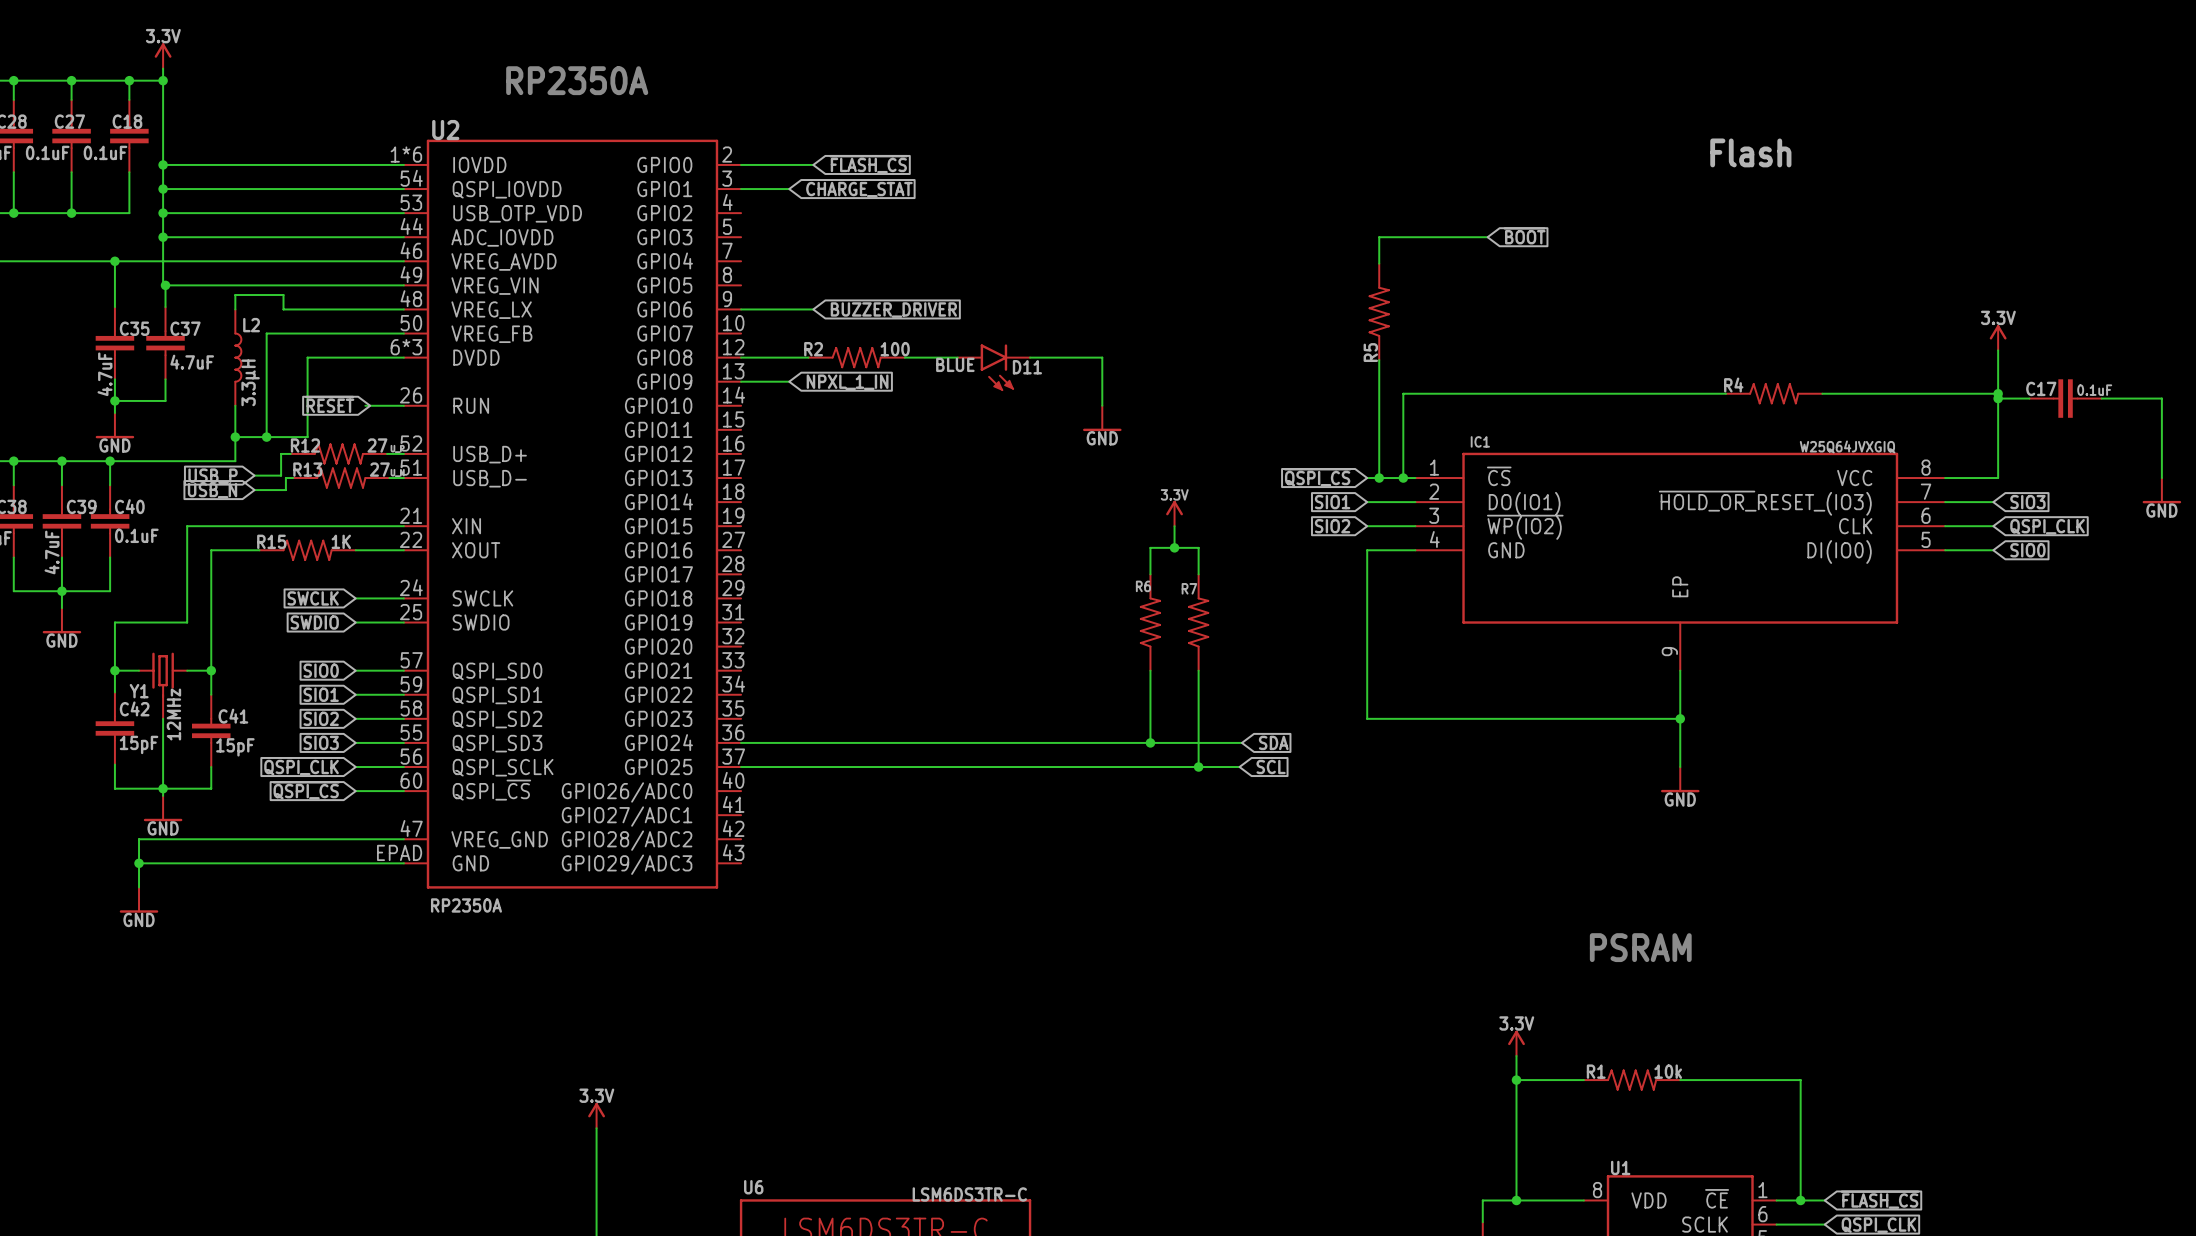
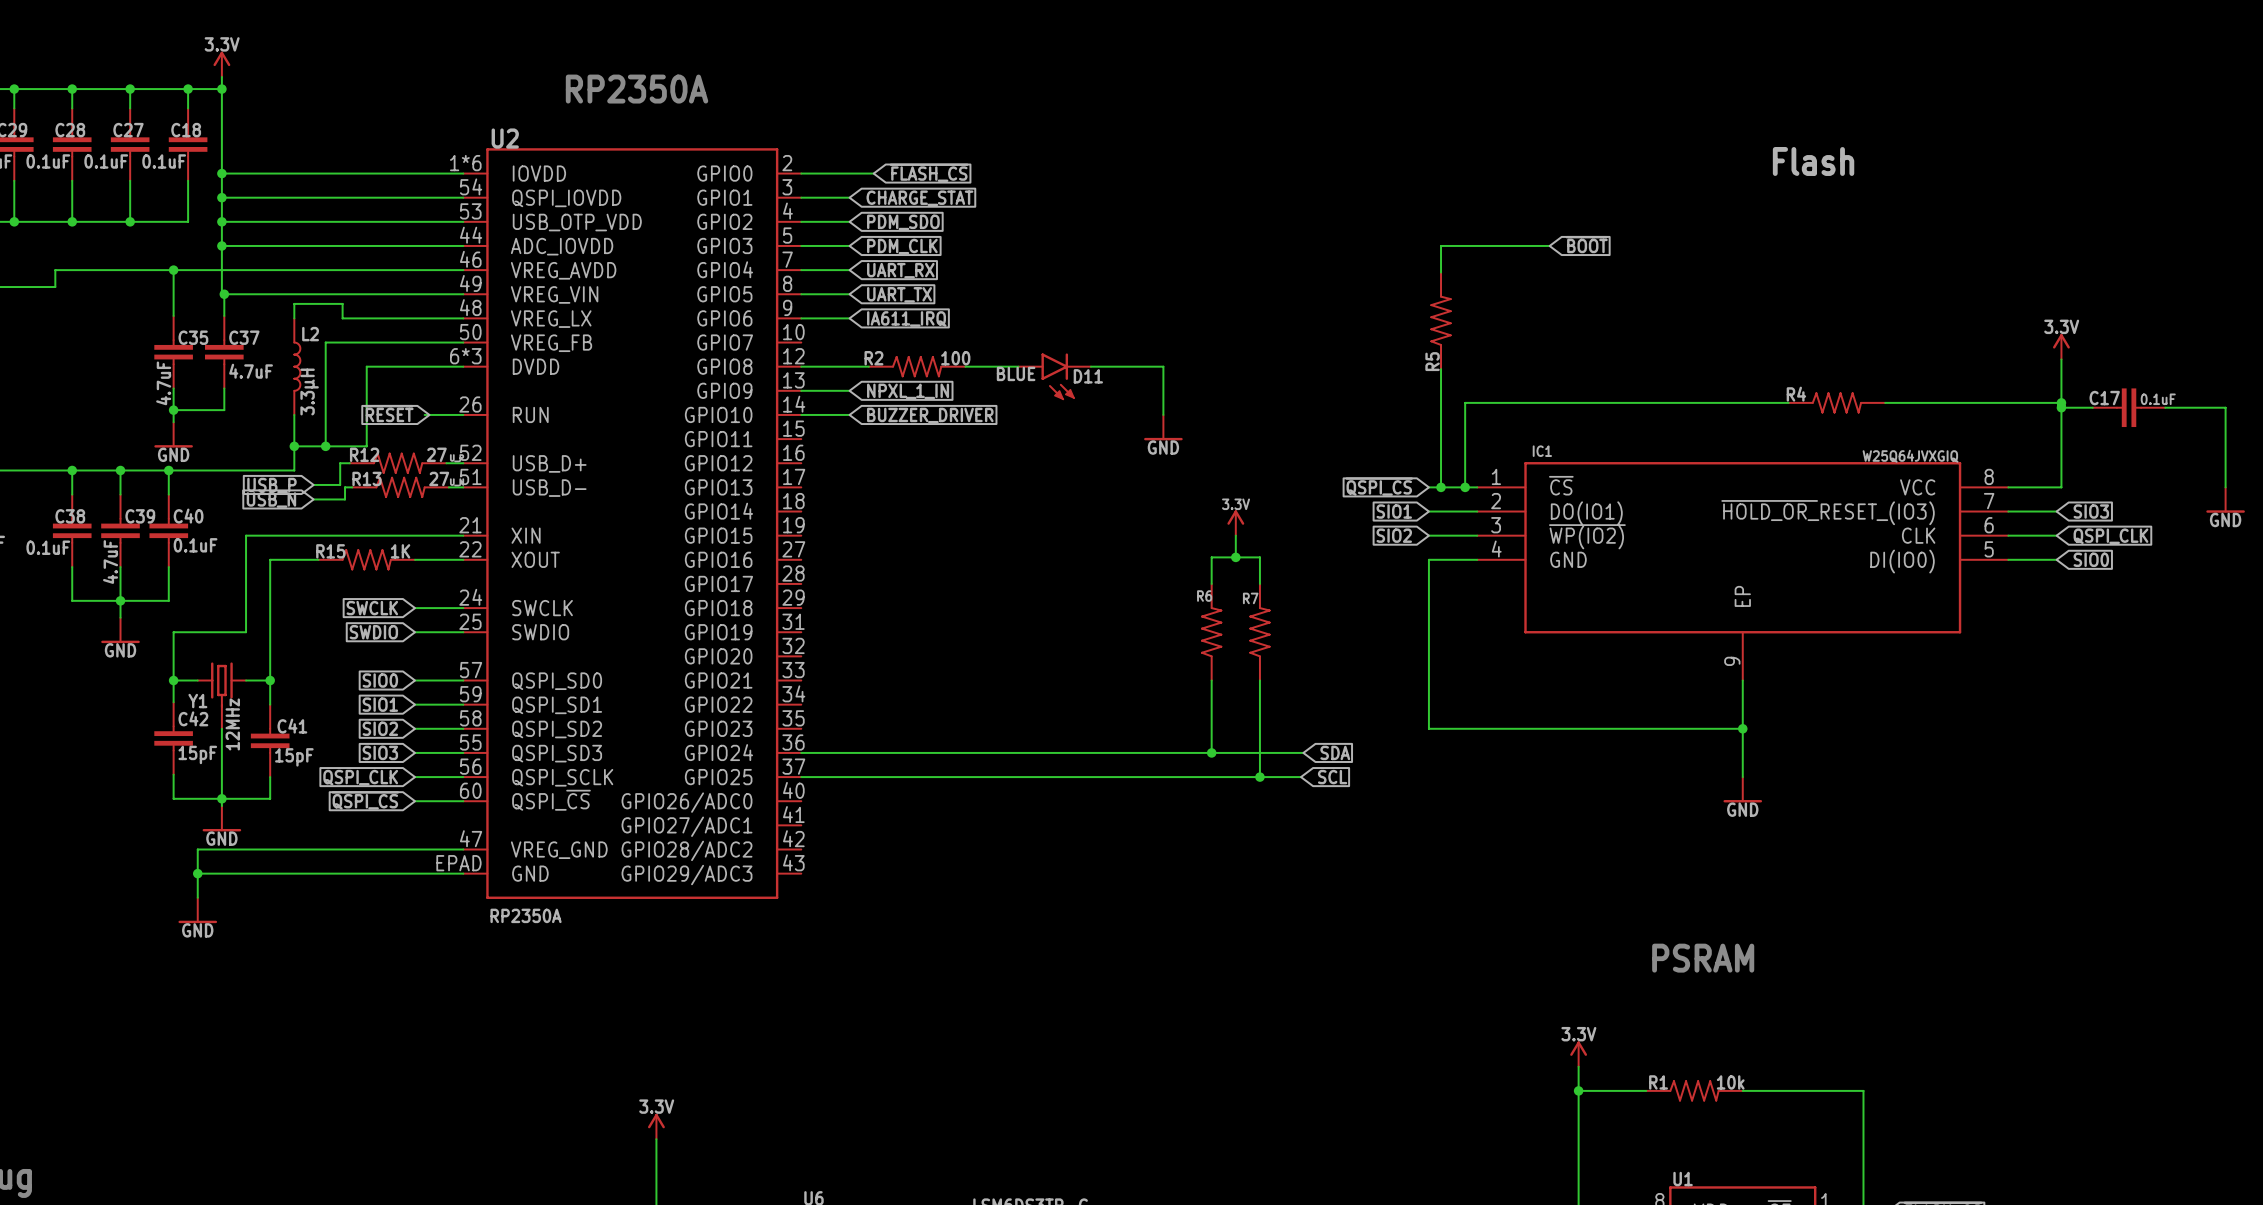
wire: none -> (801, 221) (849, 221)
global label: none -> PDM_SDO (903, 222)
wire: none -> (801, 245) (849, 245)
global label: none -> PDM_CLK (902, 246)
wire: none -> (801, 270) (849, 270)
global label: none -> UART_RX (900, 270)
wire: none -> (801, 294) (849, 294)
global label: none -> UART_TX (899, 294)
wire: (789, 309) (813, 309) -> none
global label: none -> IA611_IRQ (906, 318)
global label position: BUZZER_DRIVER (893, 310) -> BUZZER_DRIVER (930, 415)
wire: none -> (801, 414) (849, 414)

